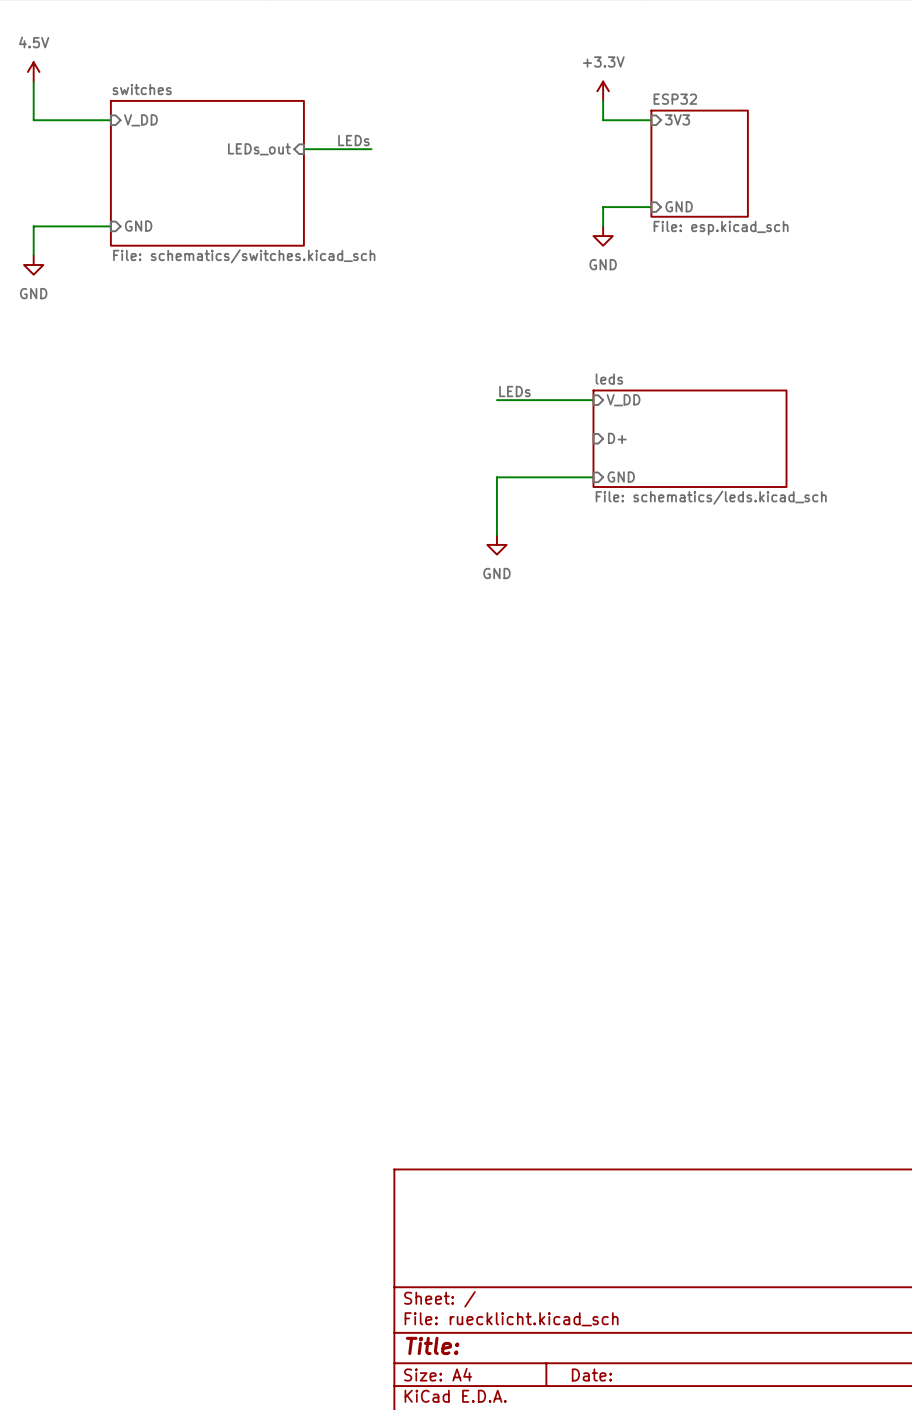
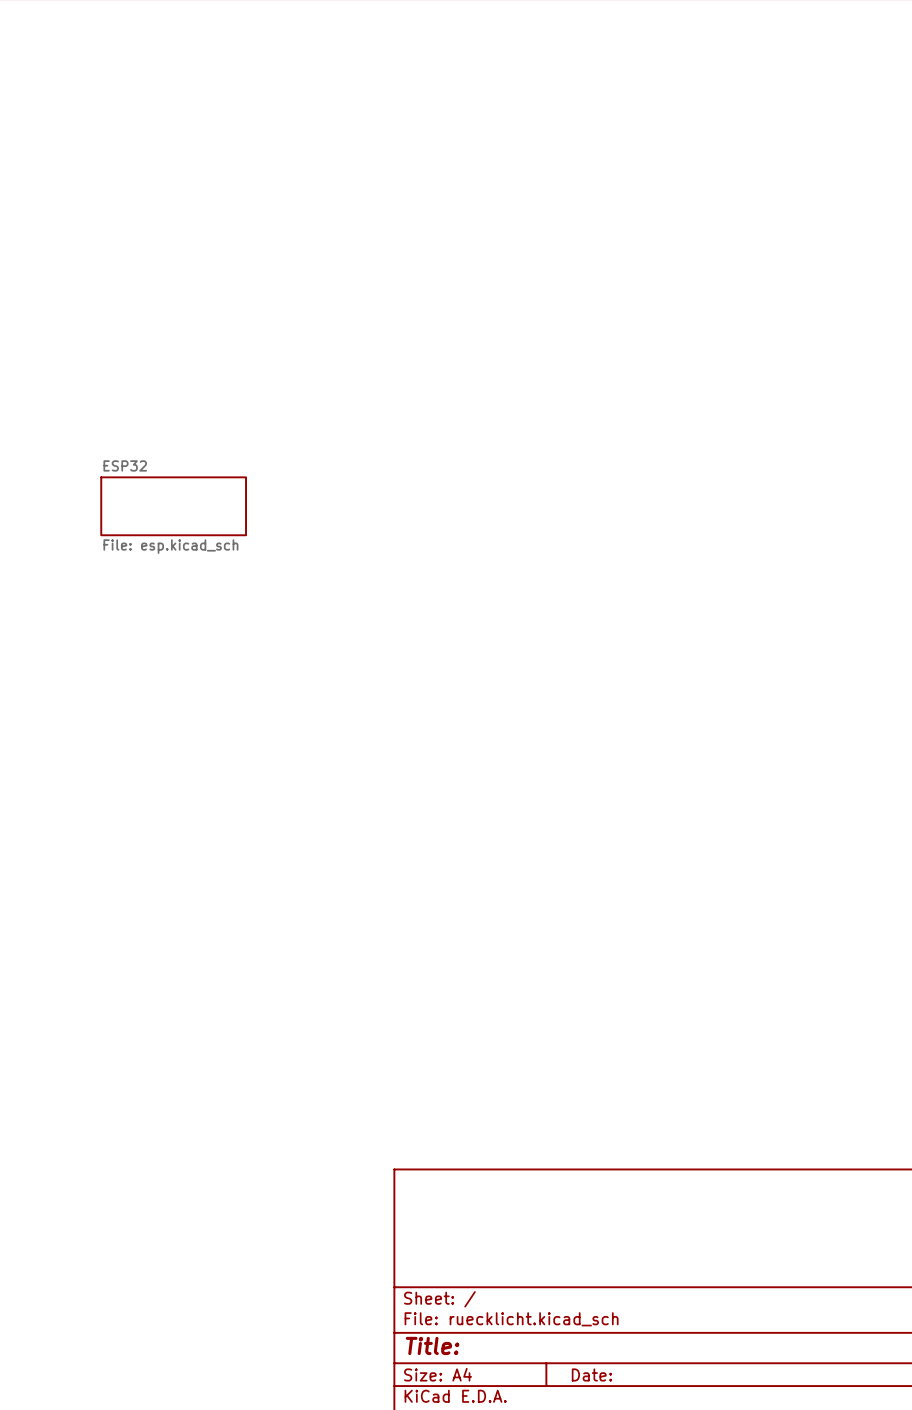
power symbol: 4.5V (33, 71) -> none
wire: (33, 81) (33, 120) (110, 120) -> none
power symbol: +3.3V (603, 91) -> none
sheet ESP32 name position: ESP32 (675, 99) -> ESP32 (125, 465)
wire: (603, 100) (603, 120) (651, 120) -> none
sheet ESP32 shape: [650, 110, 749, 218] -> [100, 476, 247, 536]
sheet pin: 3V3 (677, 119) -> none
sheet pin: V_DD (140, 120) -> none
label: LEDs (353, 140) -> none
sheet pin: LEDs_out (259, 149) -> none
wire: (303, 149) (371, 149) -> none
sheet switches: File: schematics/switches.kicad_sch (207, 173) -> none
sheet pin: GND (679, 206) -> none
wire: (651, 207) (603, 207) (603, 226) -> none
wire: (110, 226) (33, 226) (33, 255) -> none
sheet pin: GND (138, 226) -> none
sheet ESP32 value position: File: esp.kicad_sch (721, 228) -> File: esp.kicad_sch (170, 546)
power symbol: GND (603, 236) -> none
power symbol: GND (33, 265) -> none
label: LEDs (514, 391) -> none
wire: (496, 400) (593, 400) -> none
sheet pin: V_DD (623, 400) -> none
sheet pin: D+ (617, 438) -> none
sheet leds: File: schematics/leds.kicad_sch (690, 438) -> none
sheet pin: GND (621, 476) -> none
wire: (593, 477) (496, 477) (496, 535) -> none
power symbol: GND (496, 544) -> none

